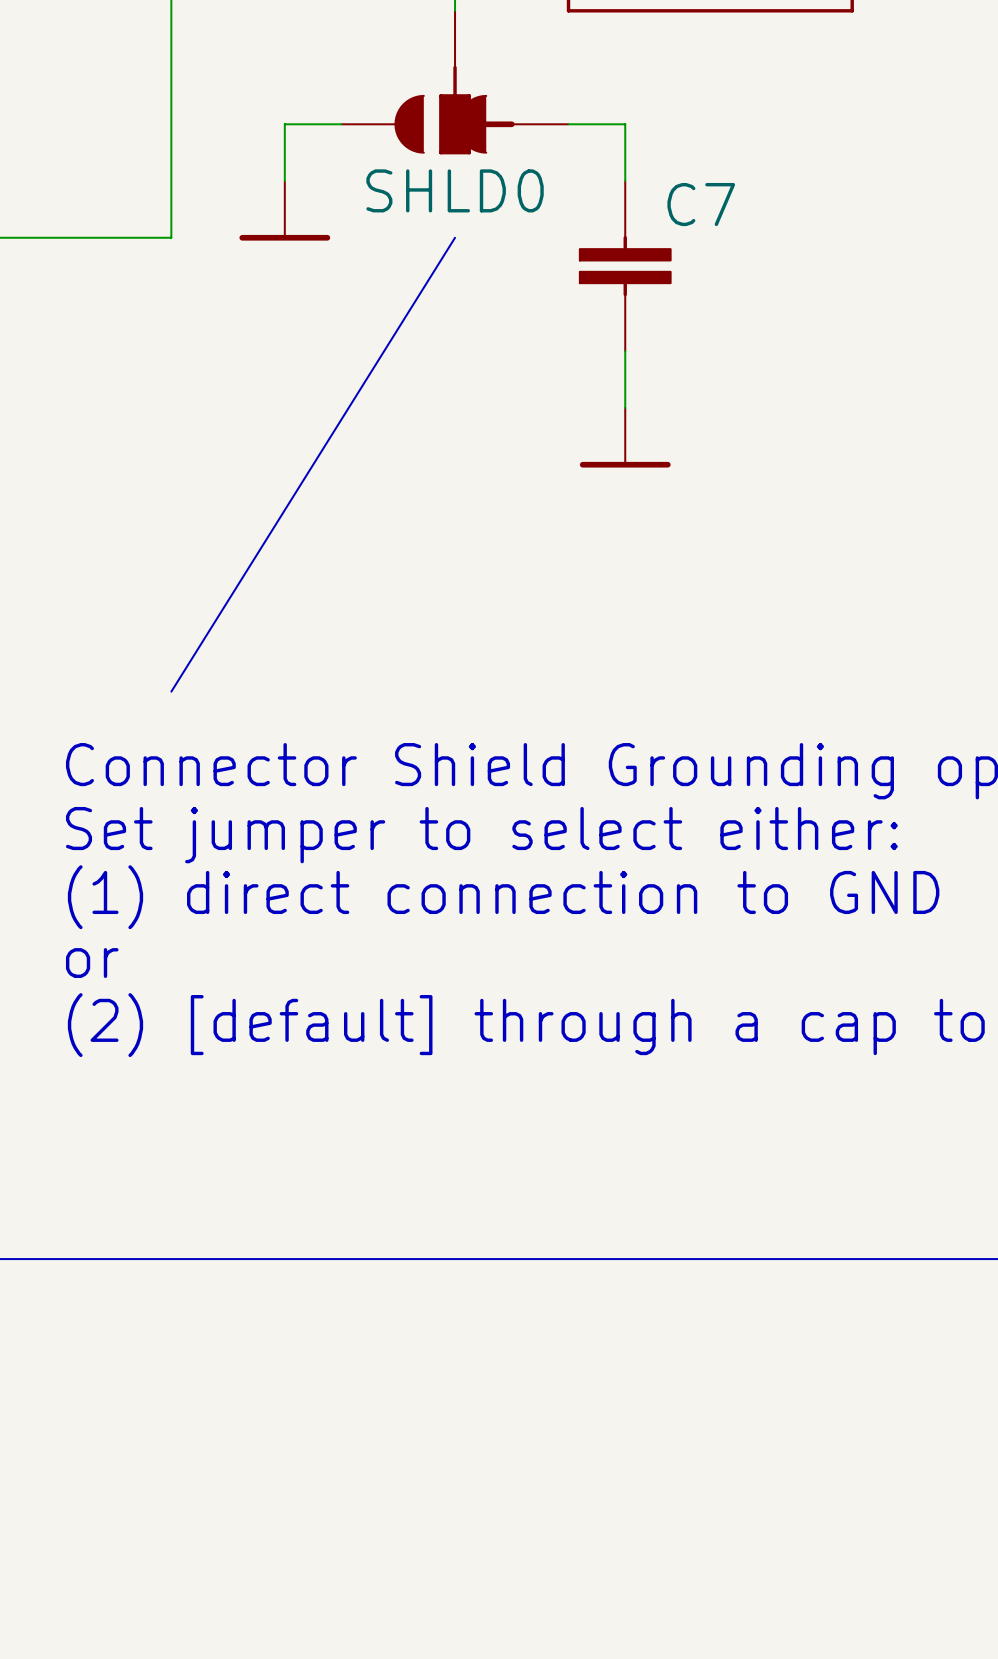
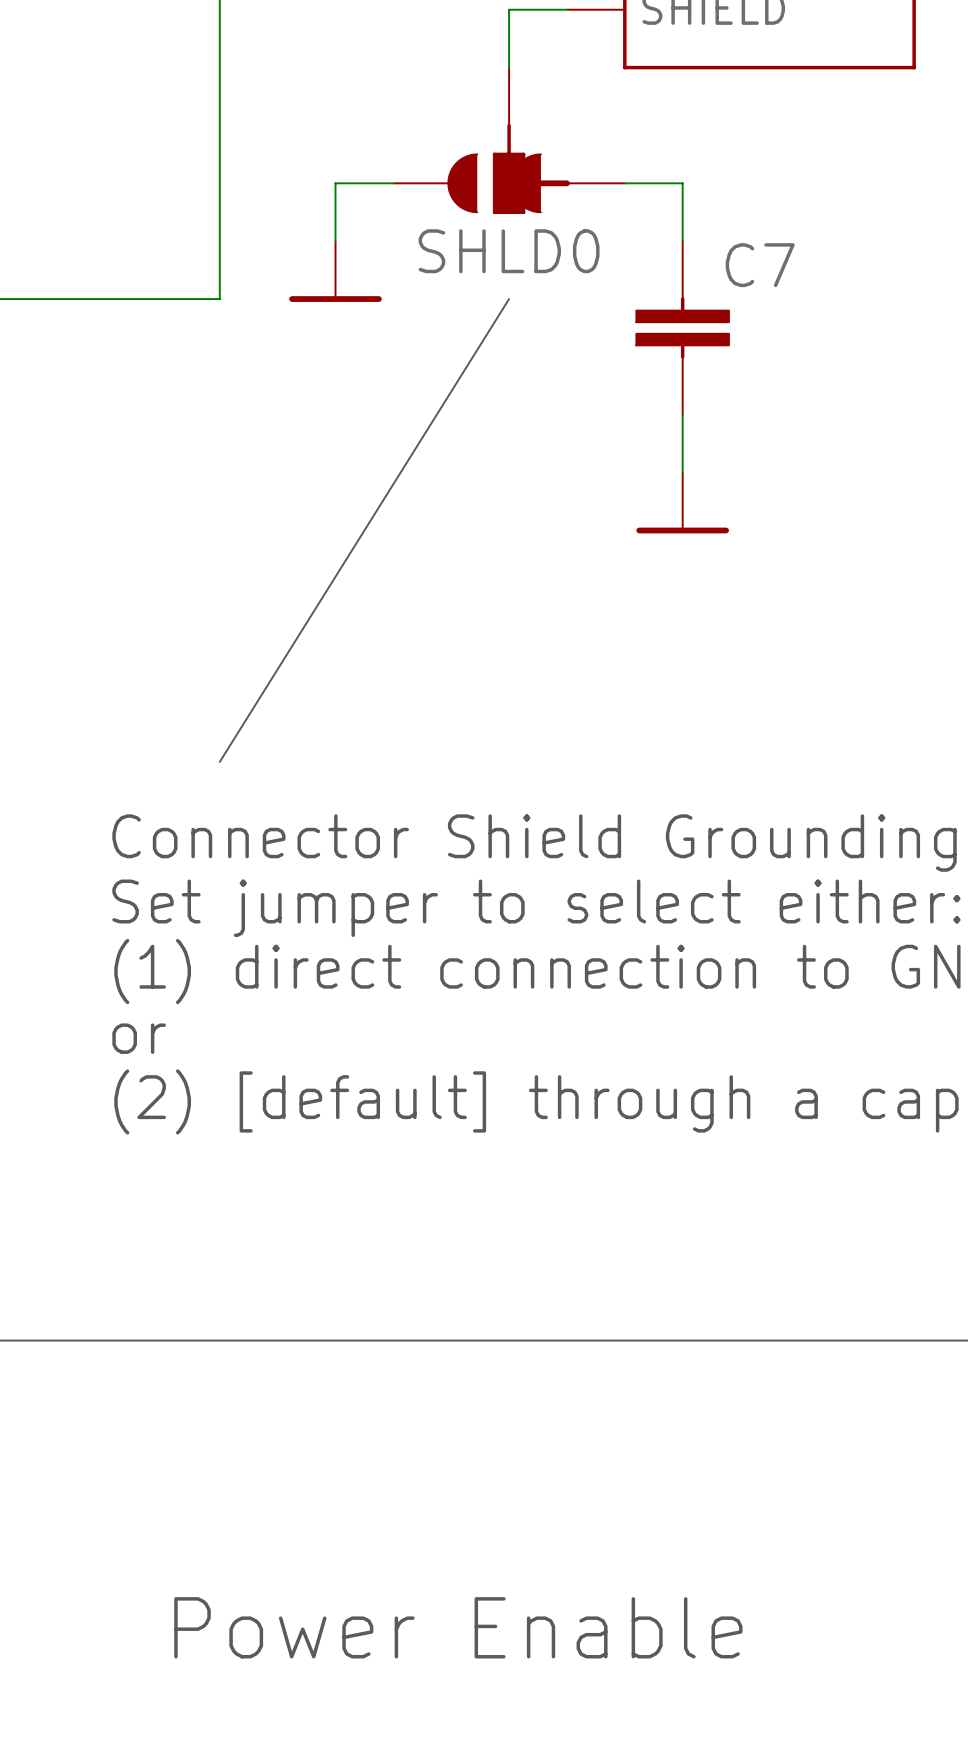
text: none -> Power Enable (458, 1627)

